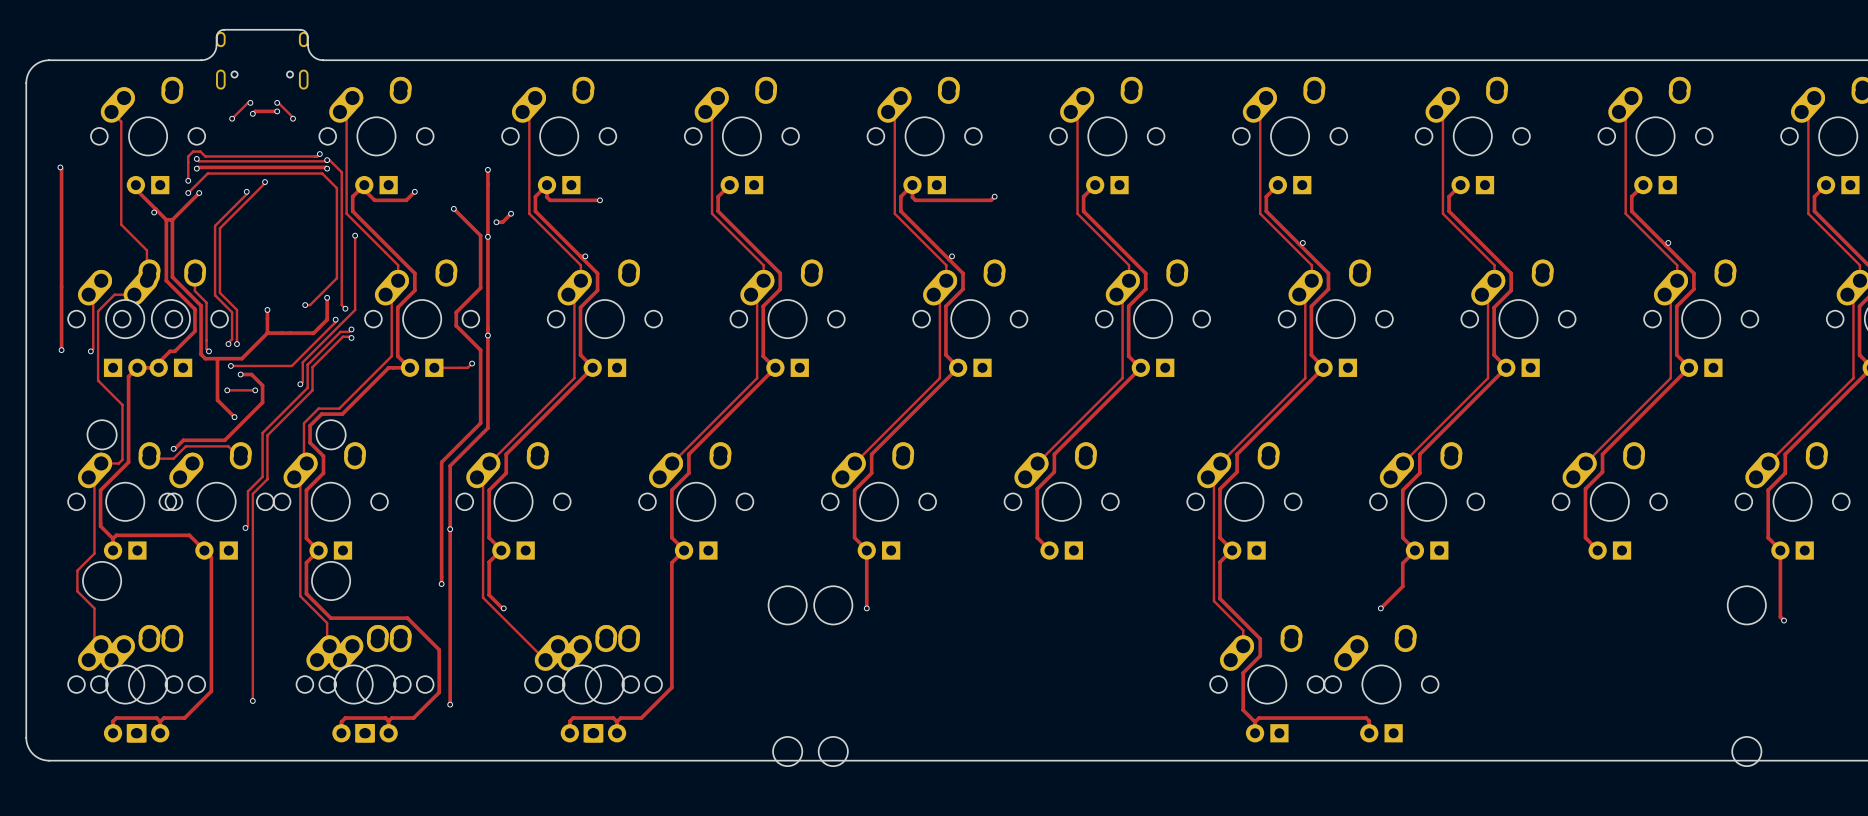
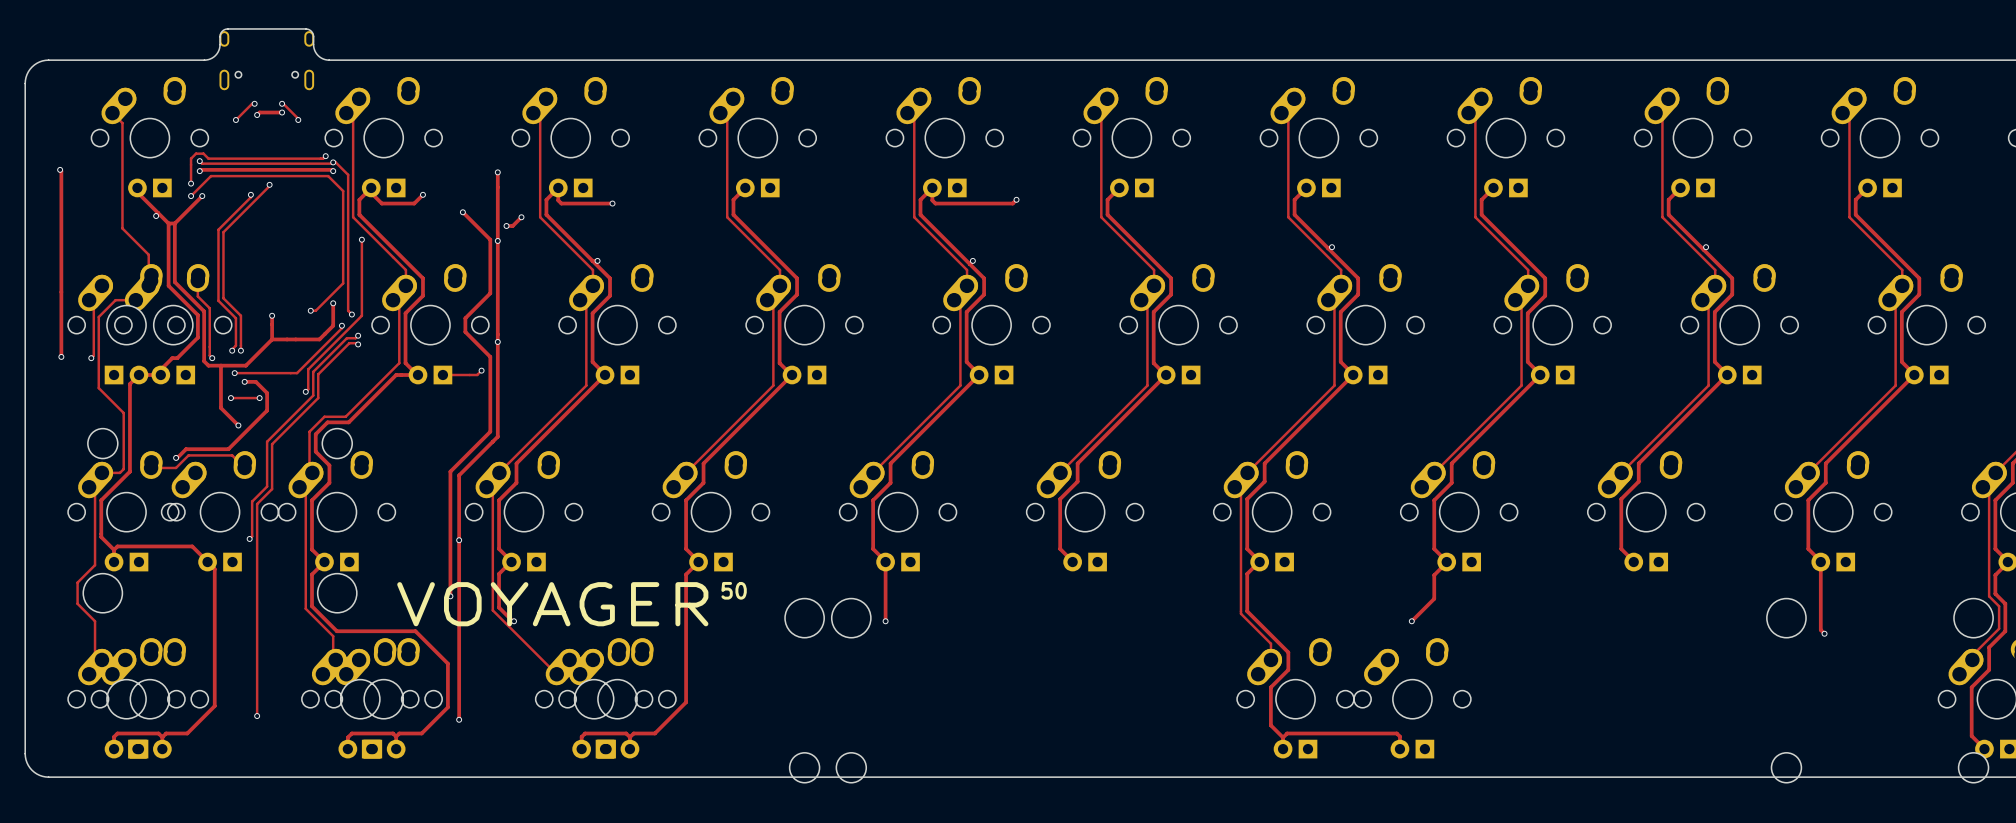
text: none -> 50 (734, 590)
text: none -> VOYAGER (552, 604)

